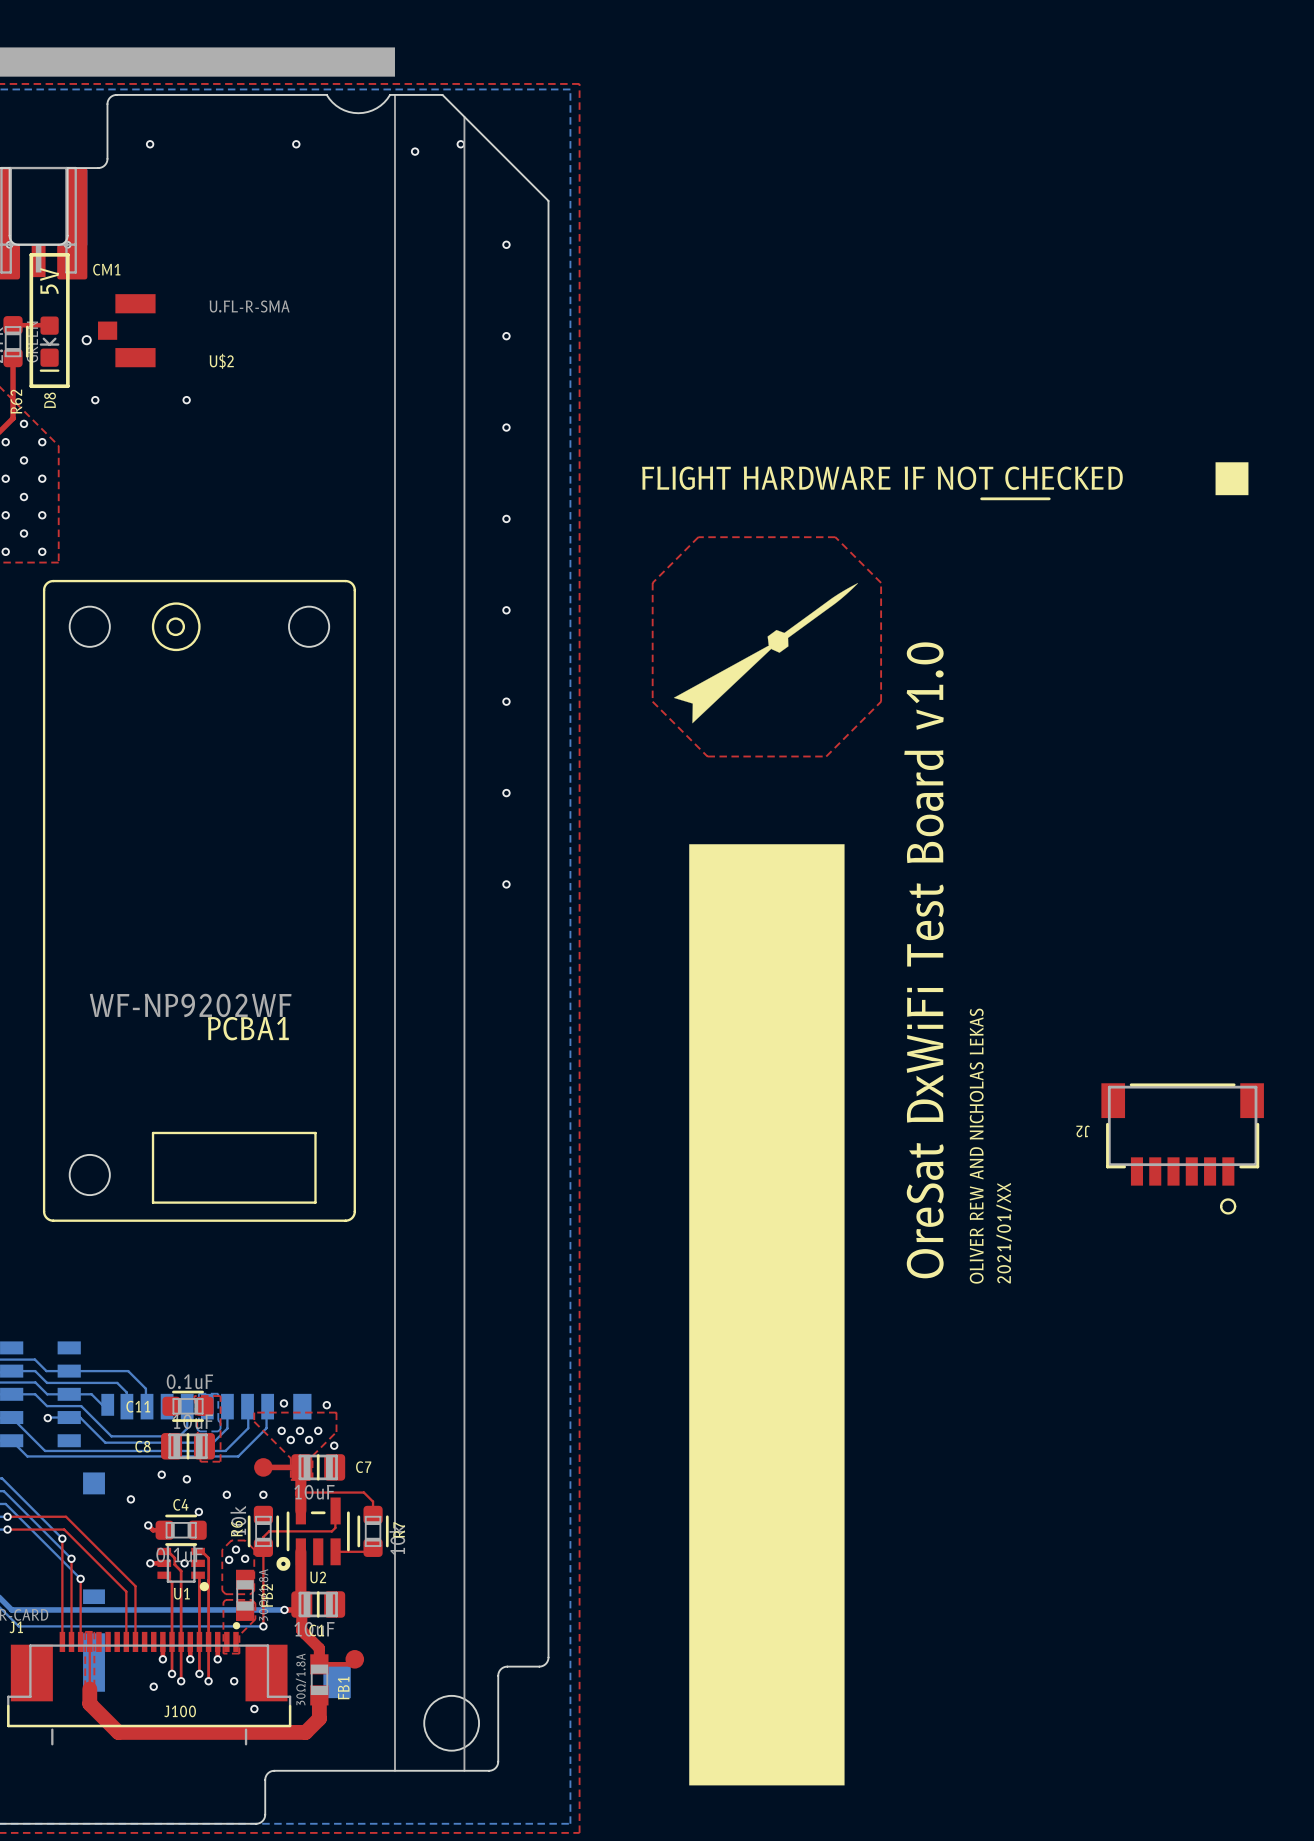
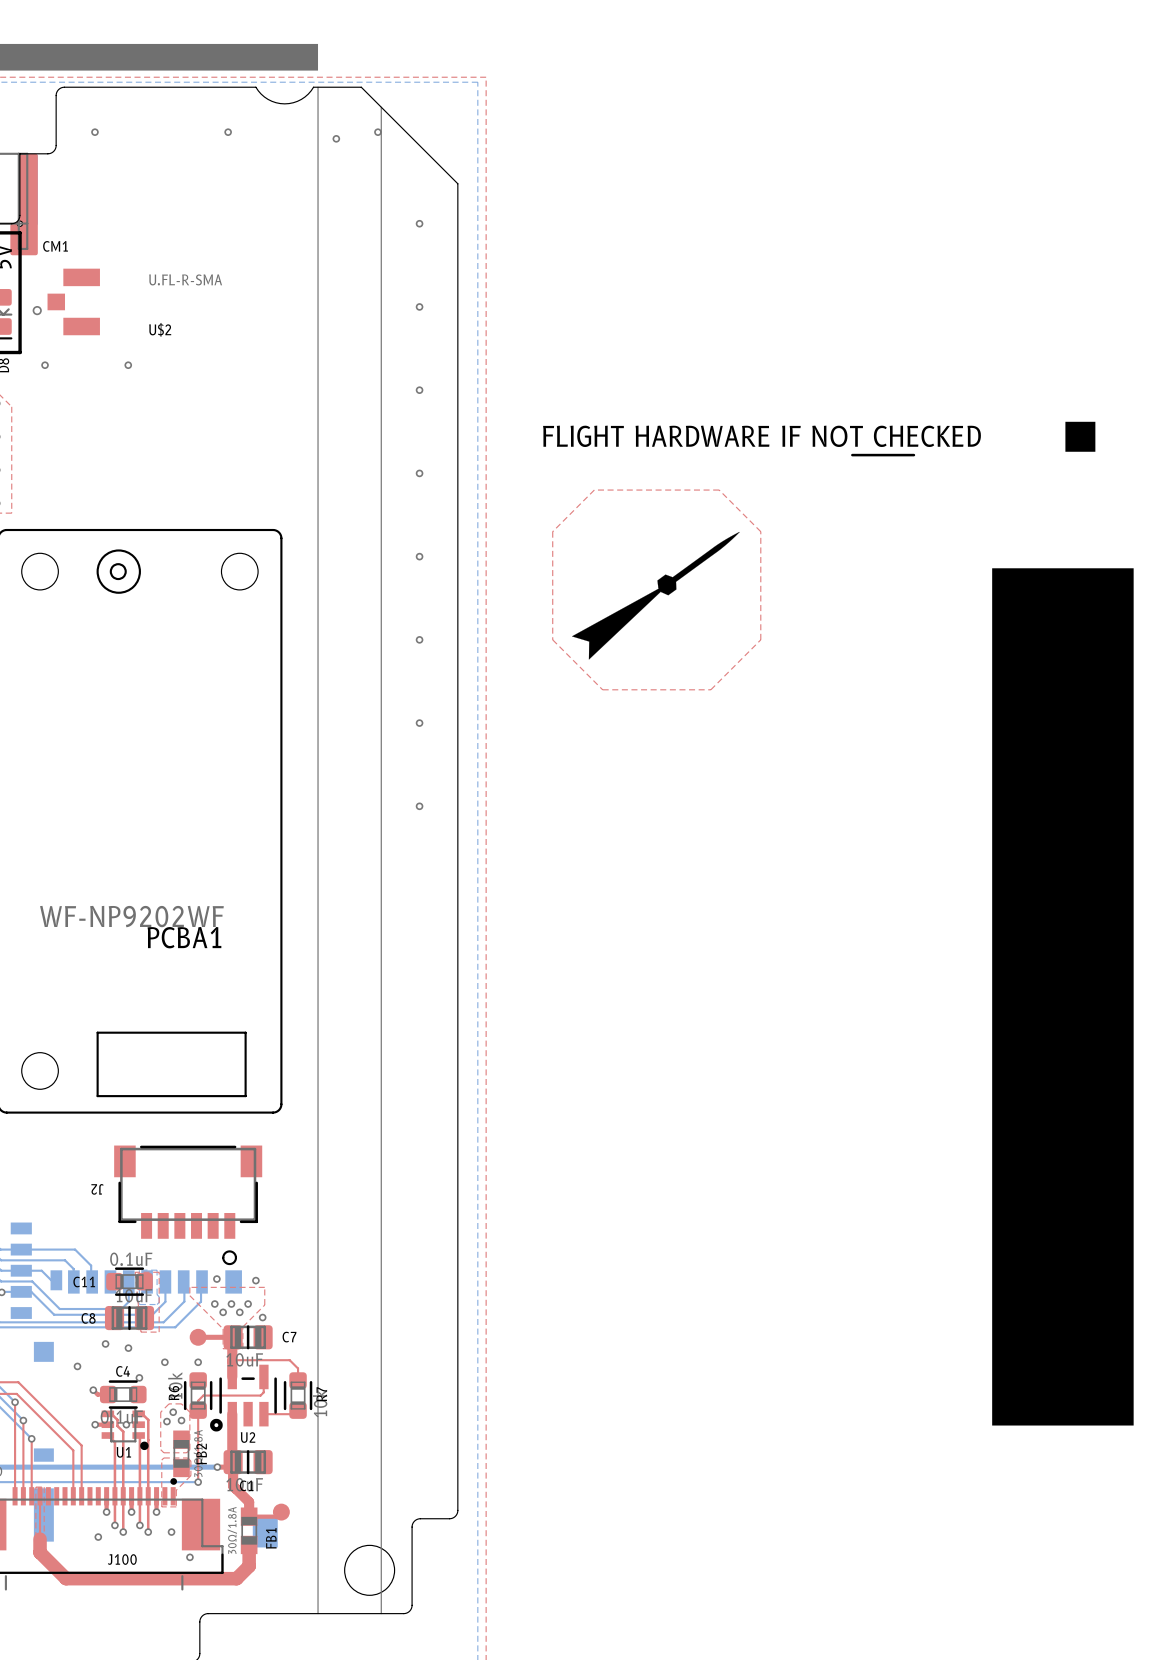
drawing: none -> [992, 568, 1134, 1426]
drawing: [689, 844, 845, 1786] -> none
text: OreSat DxWiFi Test Board v1.0 (924, 960) -> none
text: OLIVER REW AND NICHOLAS LEKAS (976, 1146) -> none
J2 position: (1182, 1148) -> (188, 1205)
text: 2021/01/XX (1004, 1233) -> none

